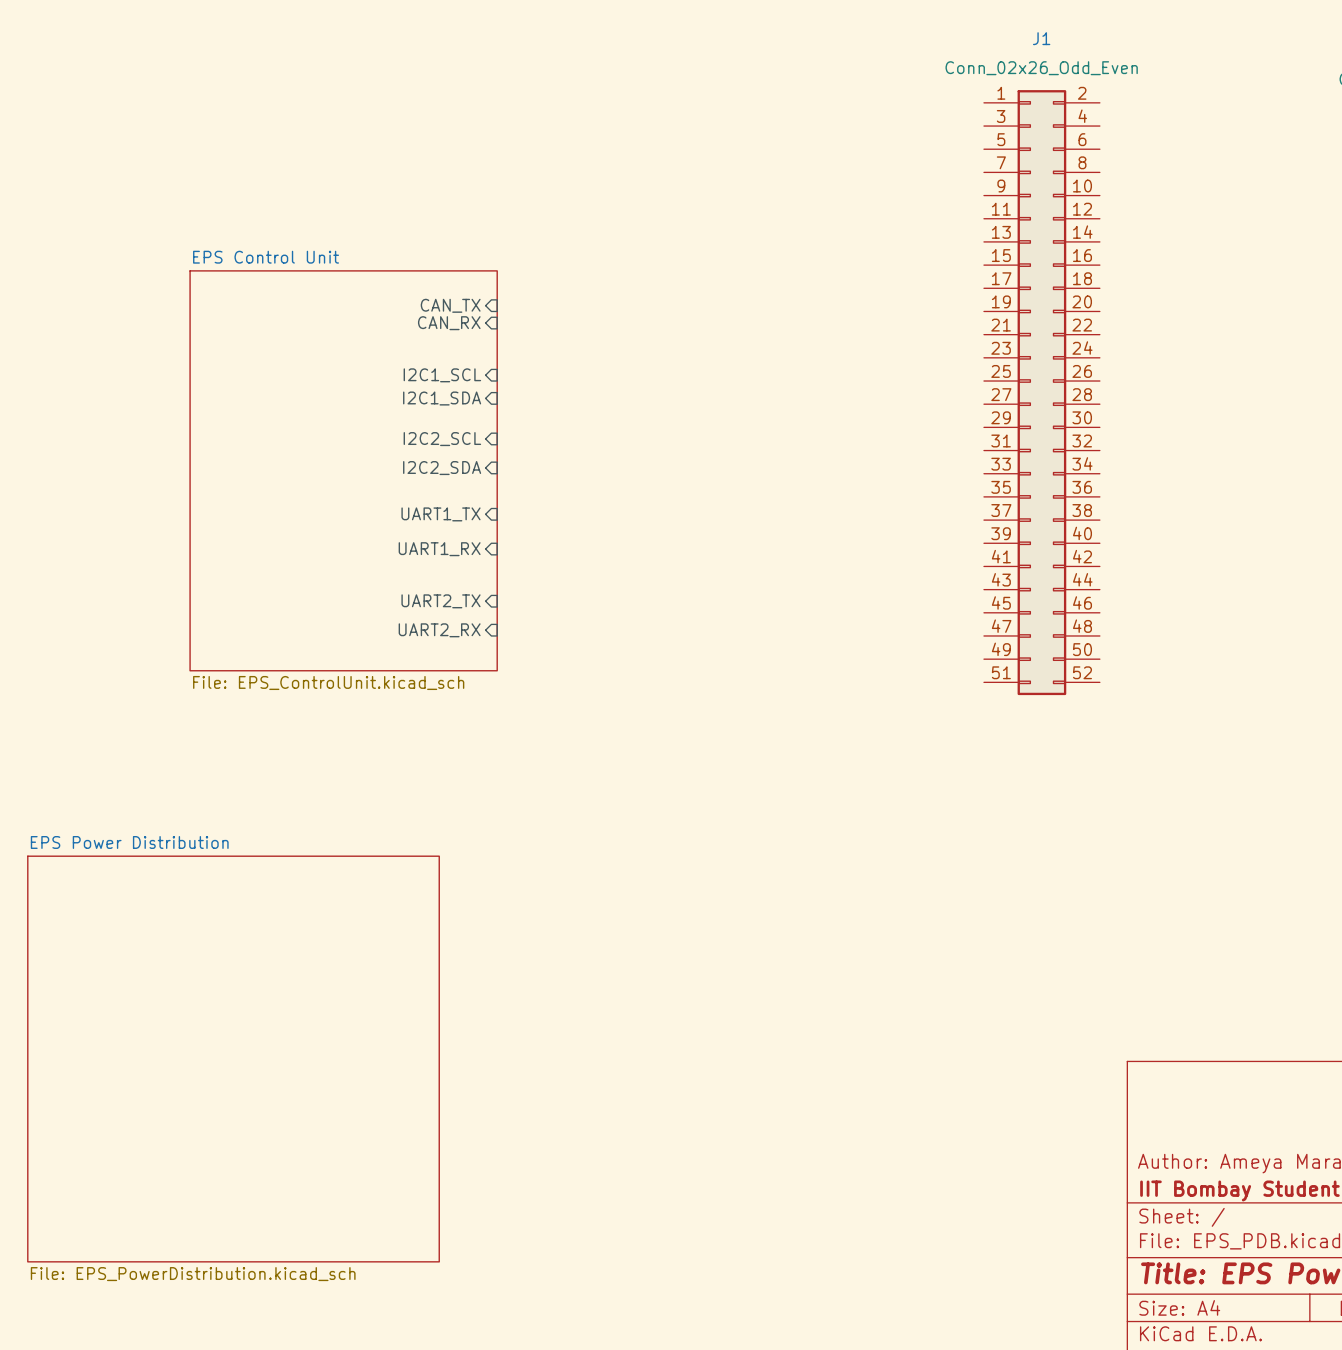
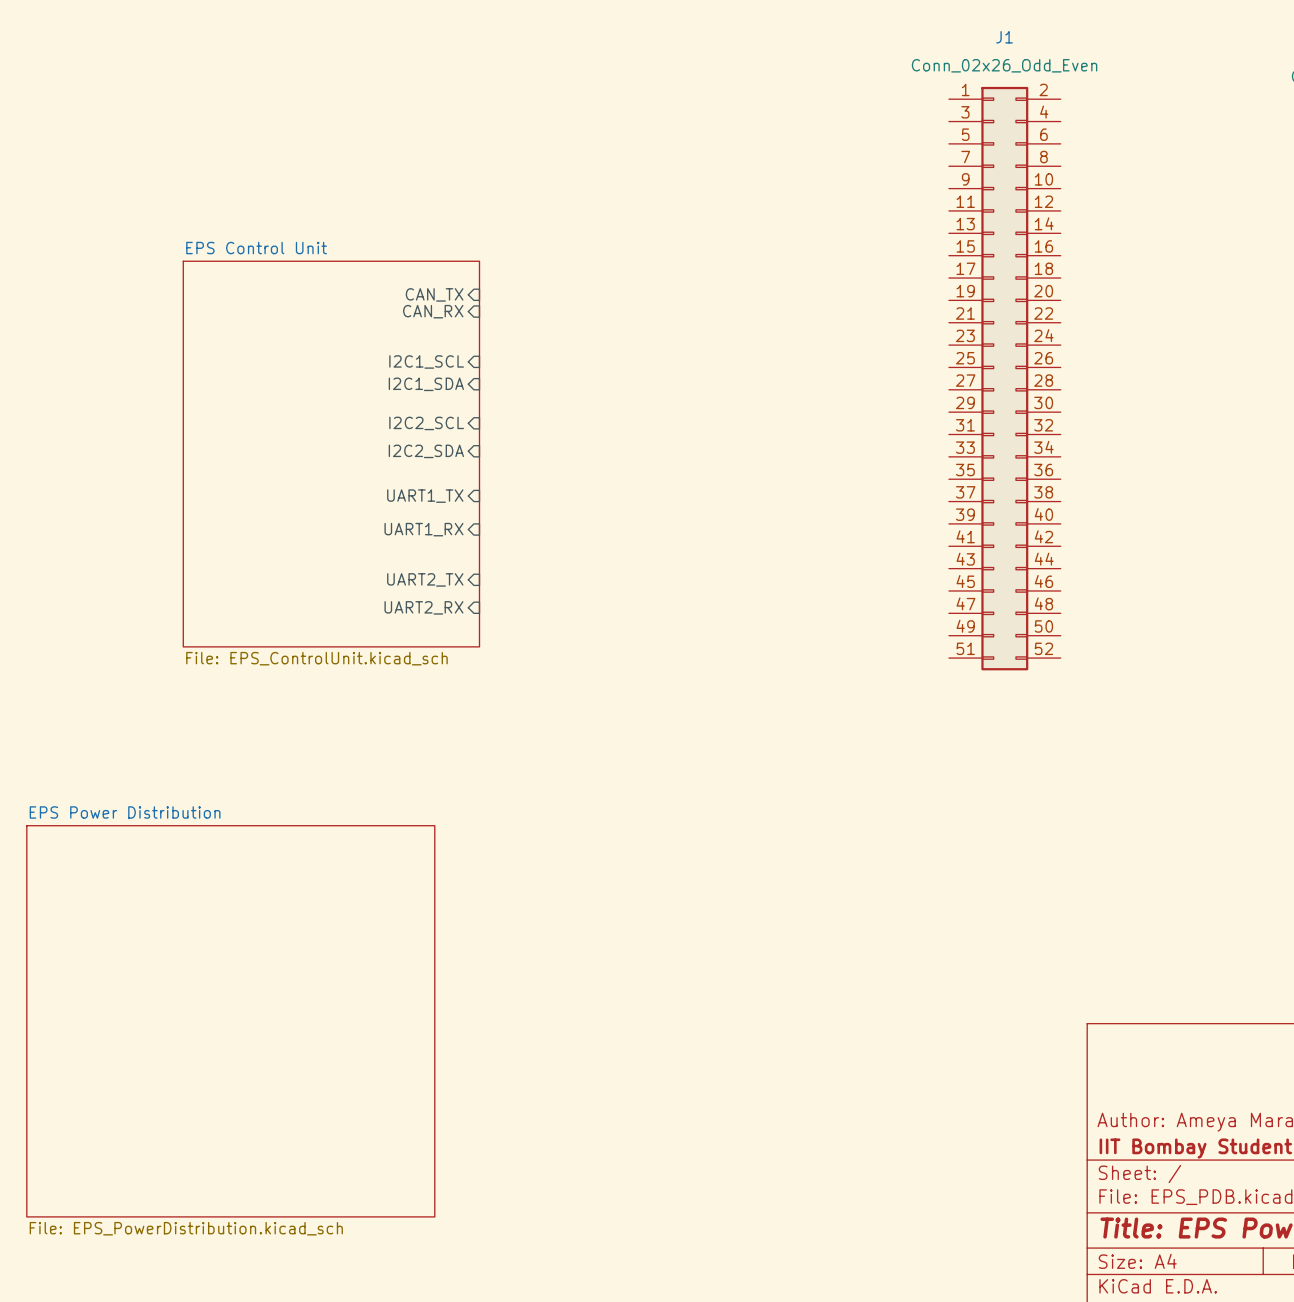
sheet EPS Power Distribution shape: [27, 855, 440, 1263] -> [26, 825, 436, 1218]

